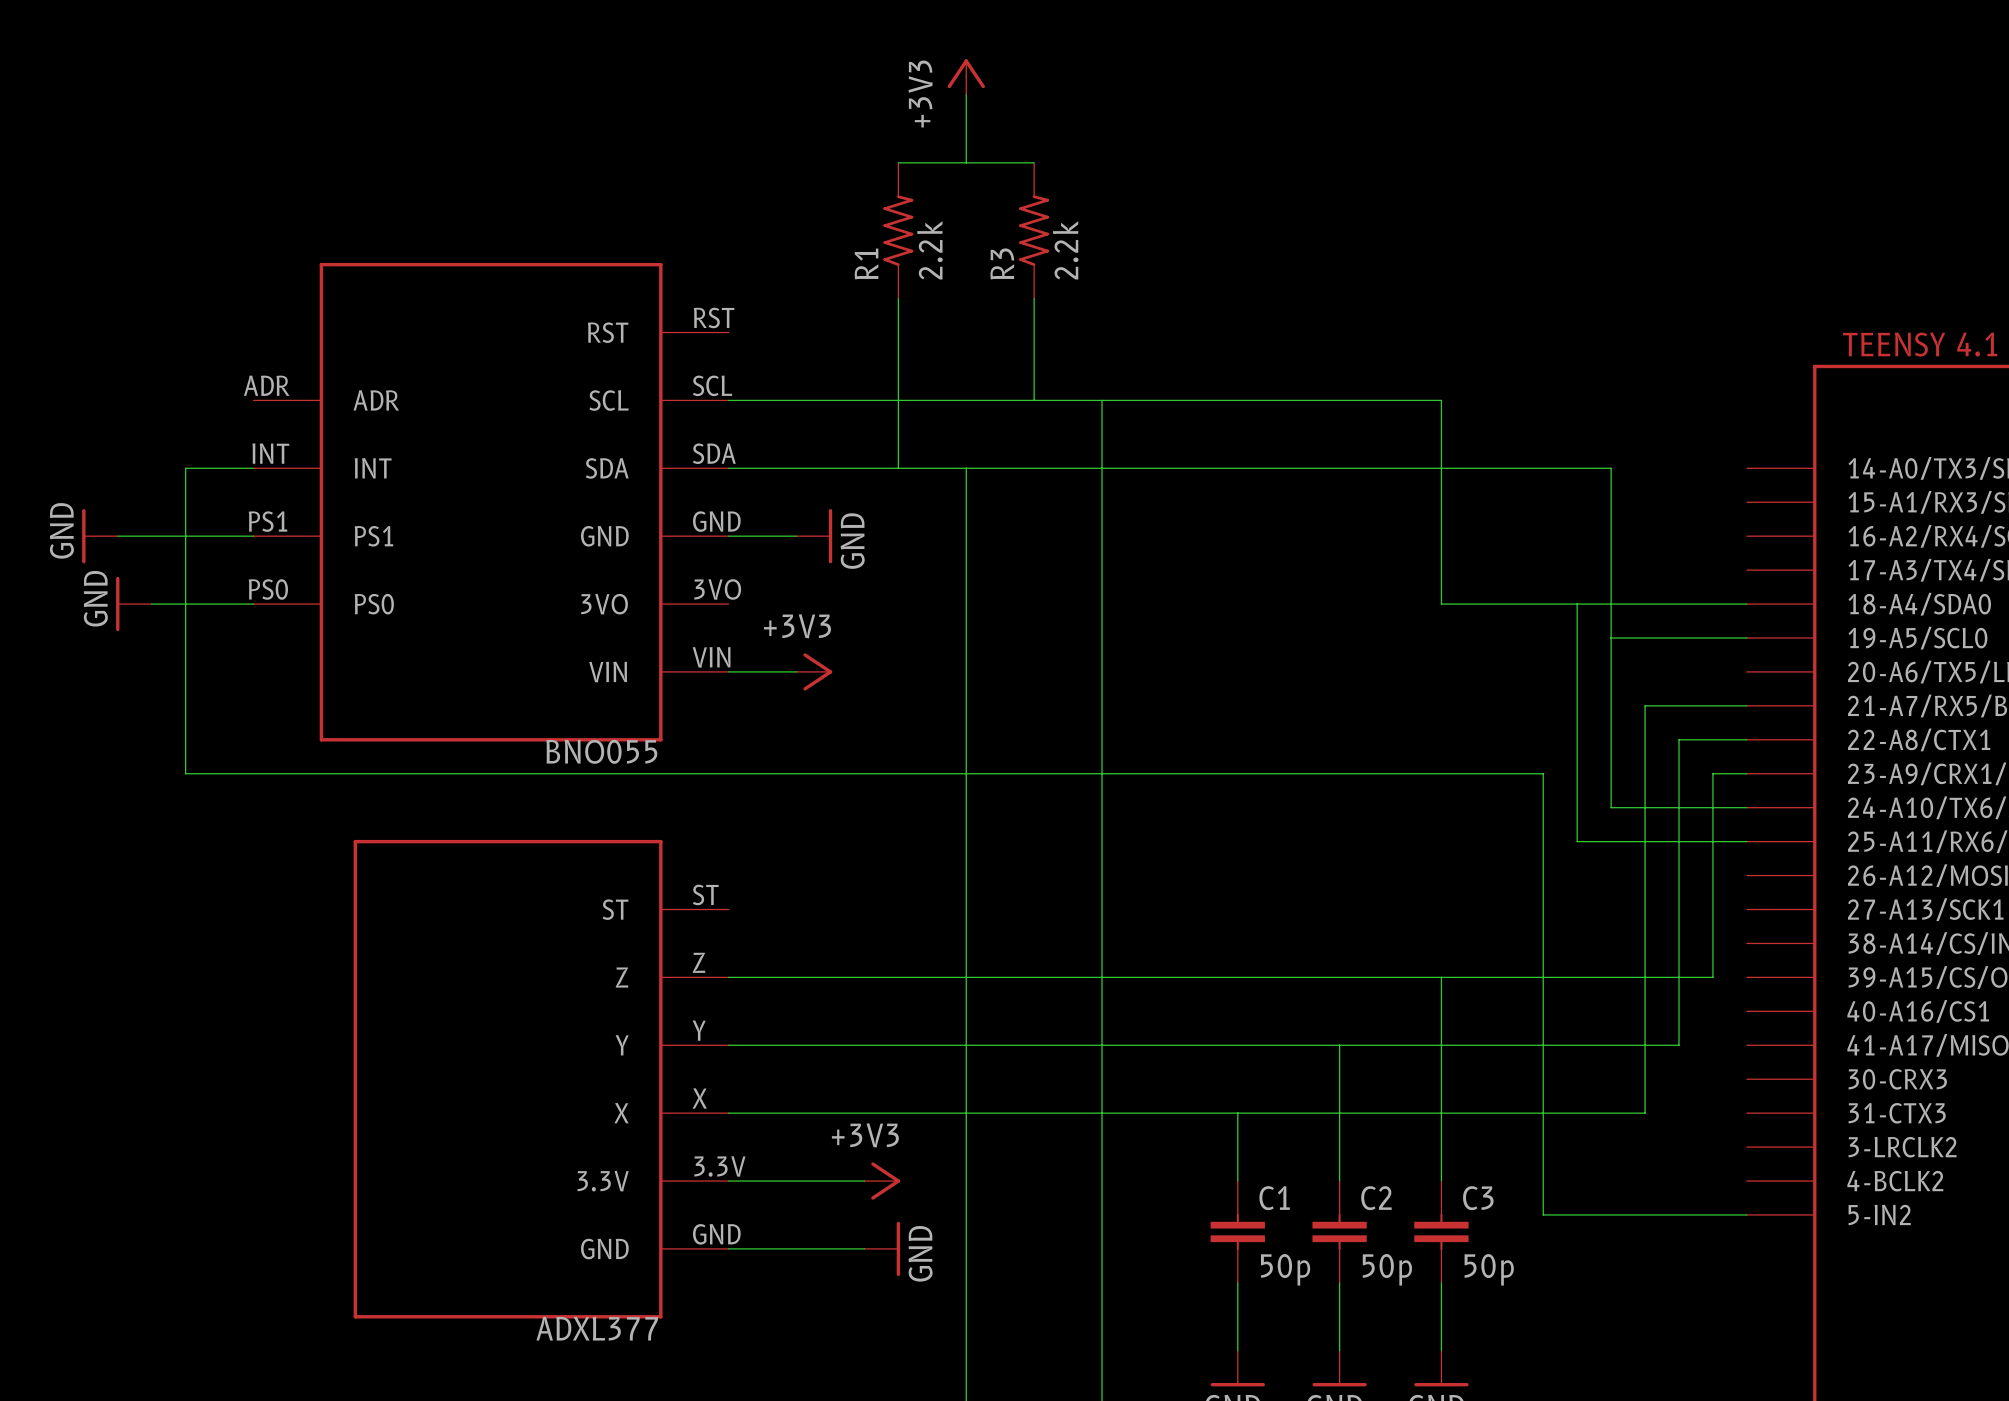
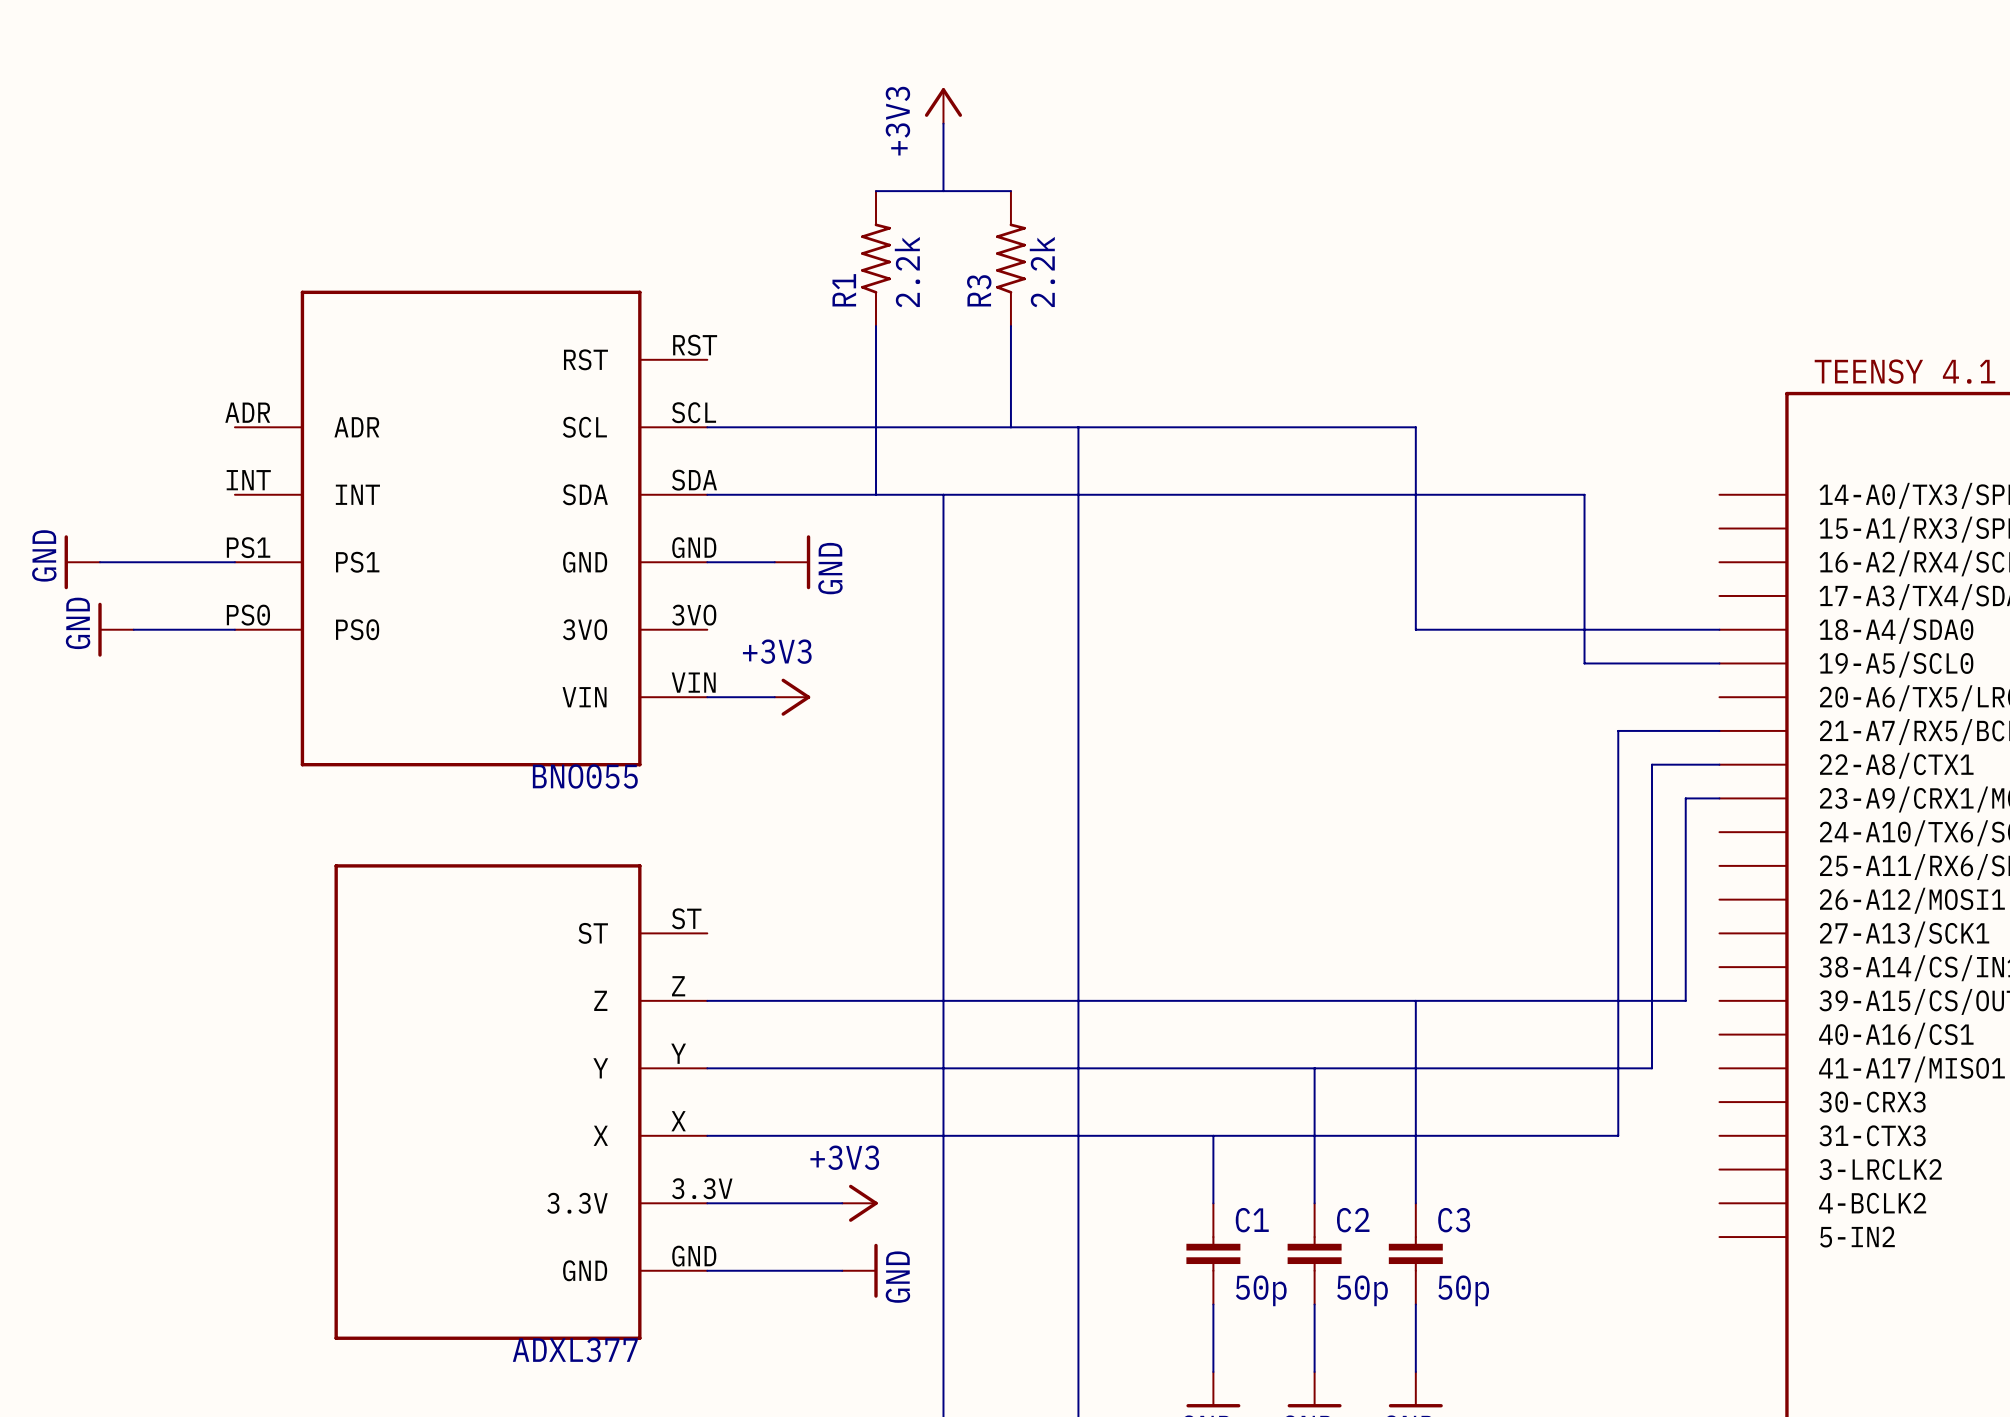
wire: (253, 468) (185, 468) (185, 773) (1543, 773) (1543, 1214) (1746, 1214) -> none
wire: (1577, 604) (1577, 841) (1746, 841) -> none
wire: (1611, 637) (1611, 807) (1746, 807) -> none

